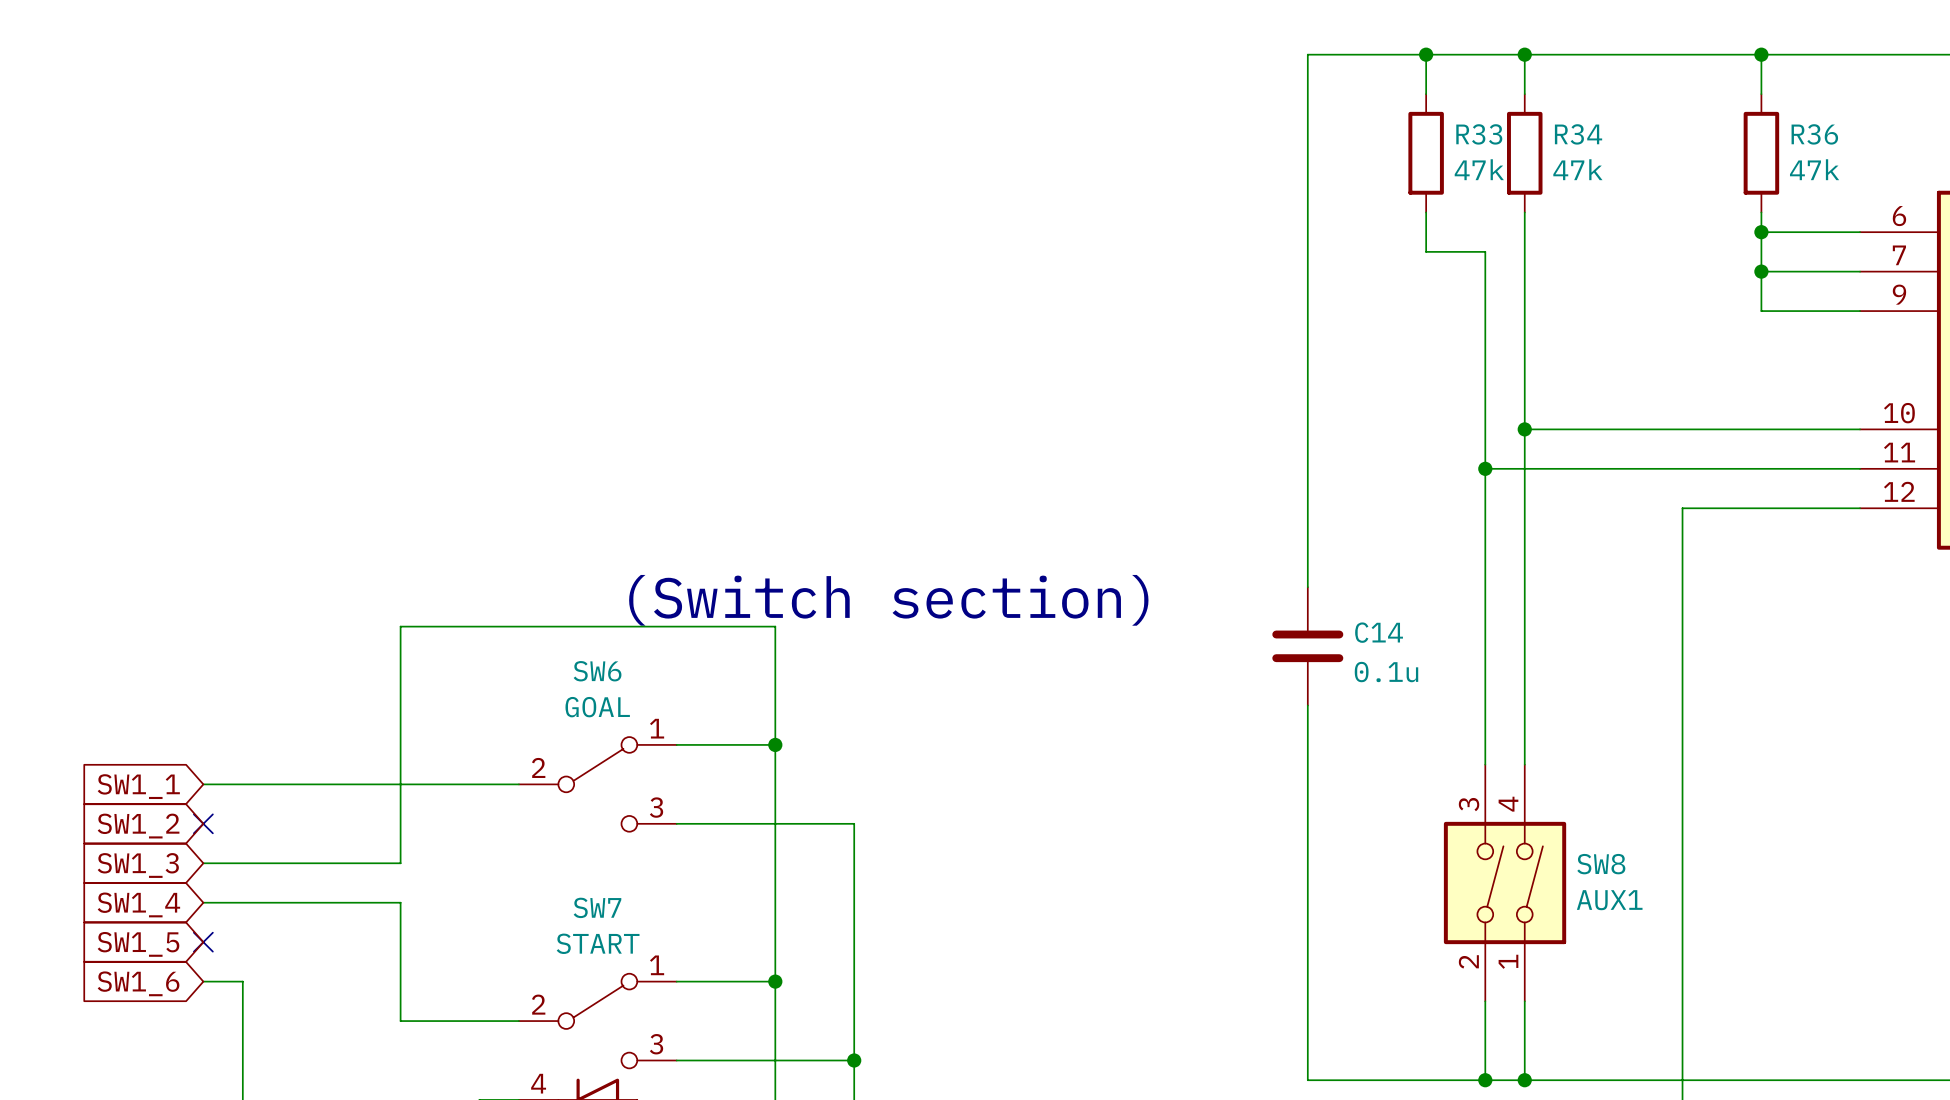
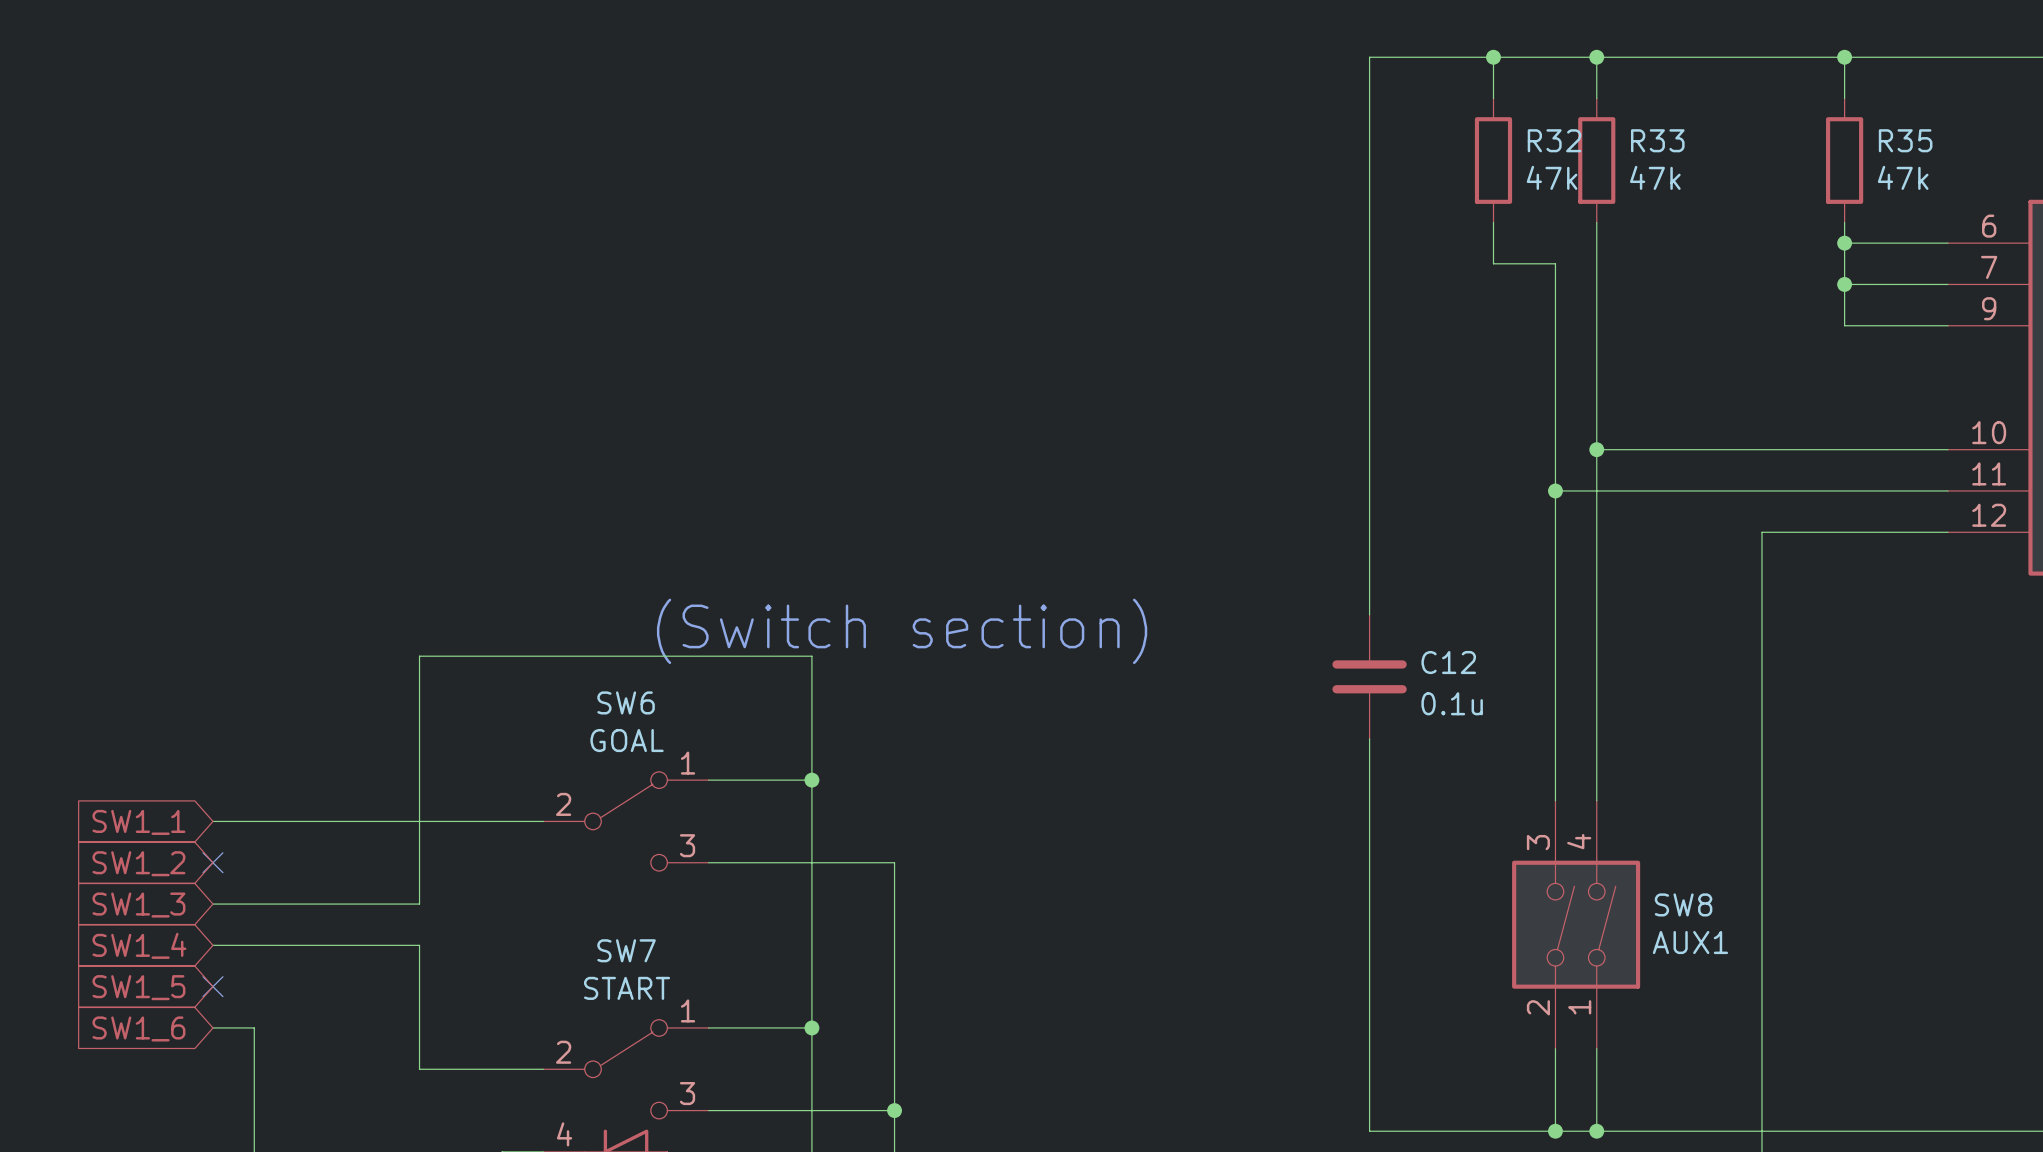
R33 name: R33 (1479, 134) -> R32 (1554, 140)
R34 name: R34 (1578, 134) -> R33 (1657, 140)
R36 name: R36 (1814, 134) -> R35 (1905, 140)
C14 name: C14 (1379, 632) -> C12 (1448, 662)

